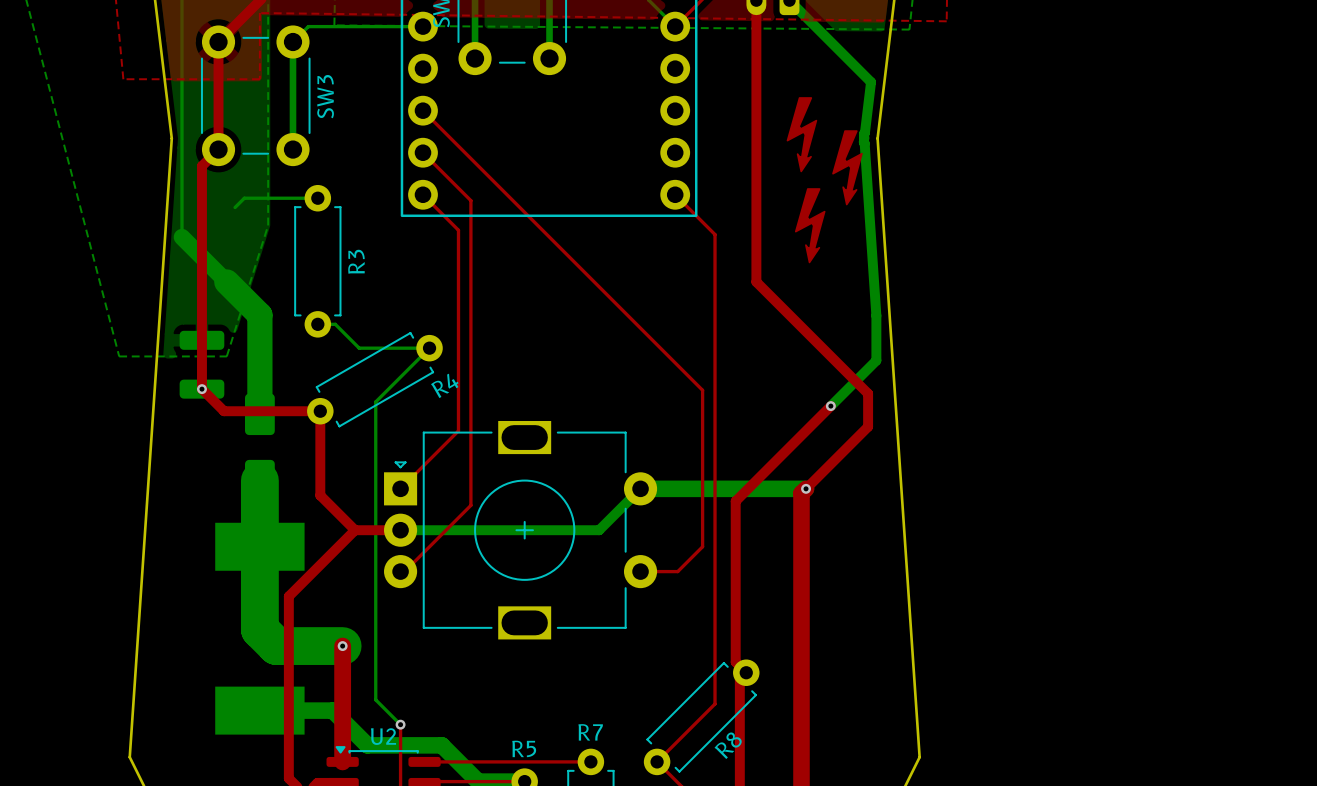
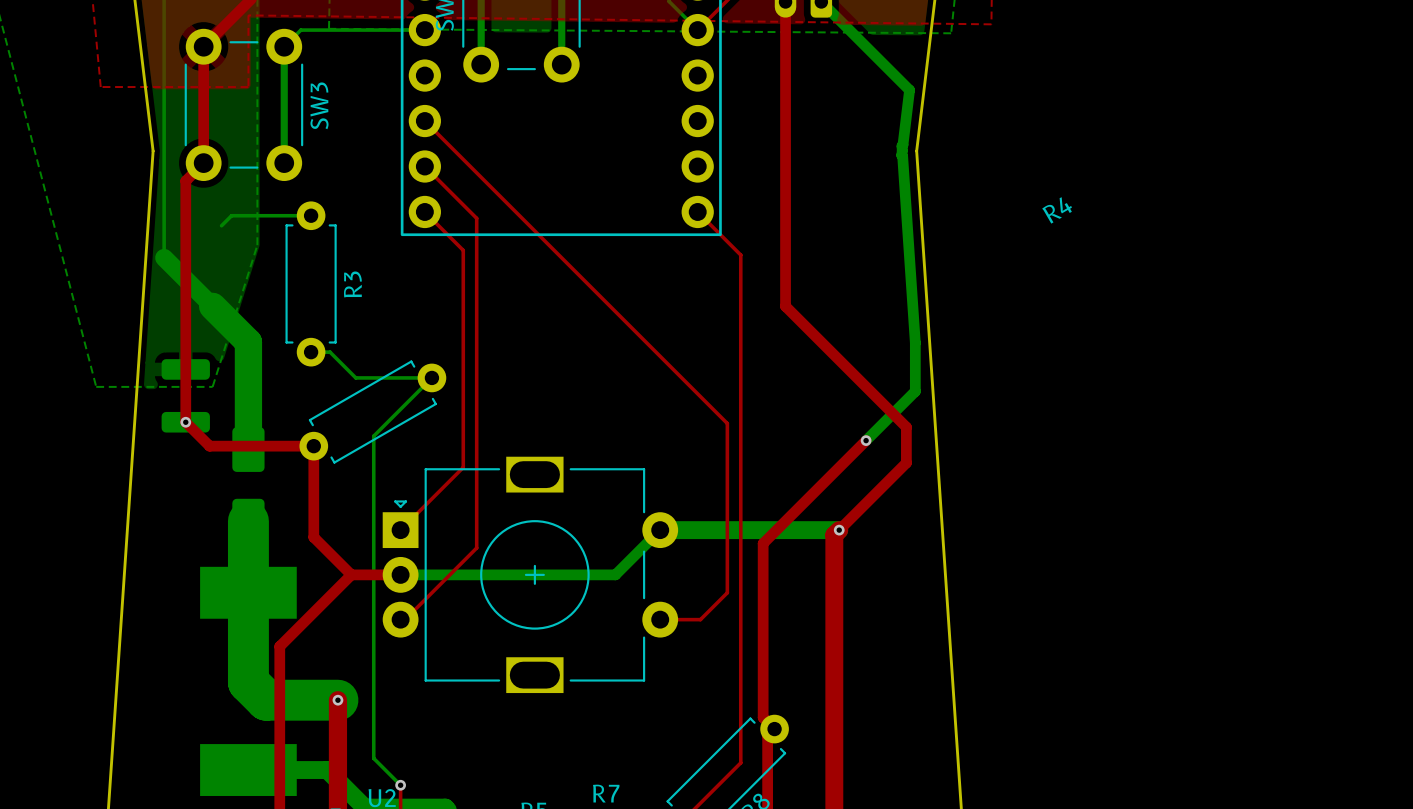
drawing: [786, 97, 863, 264] -> none
R4 name position: R4 (444, 385) -> R4 (1057, 210)

